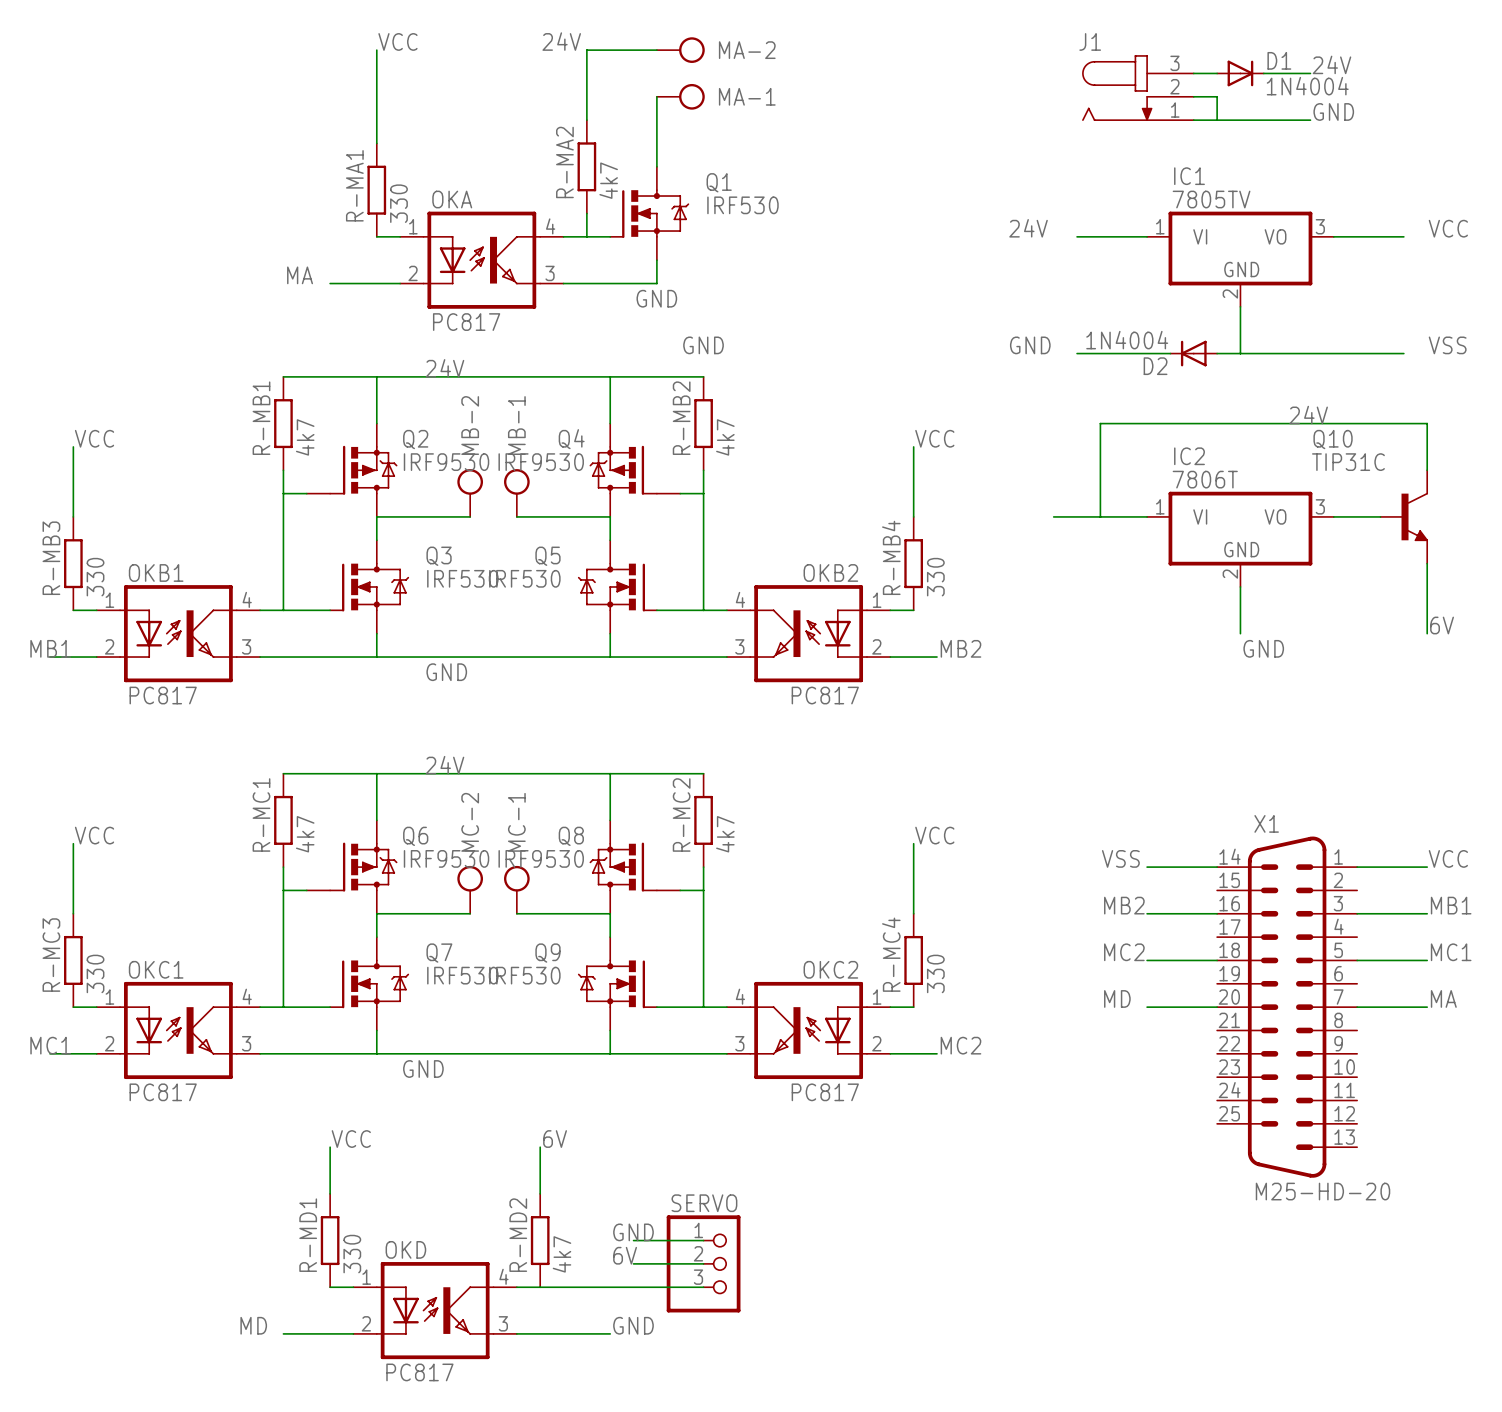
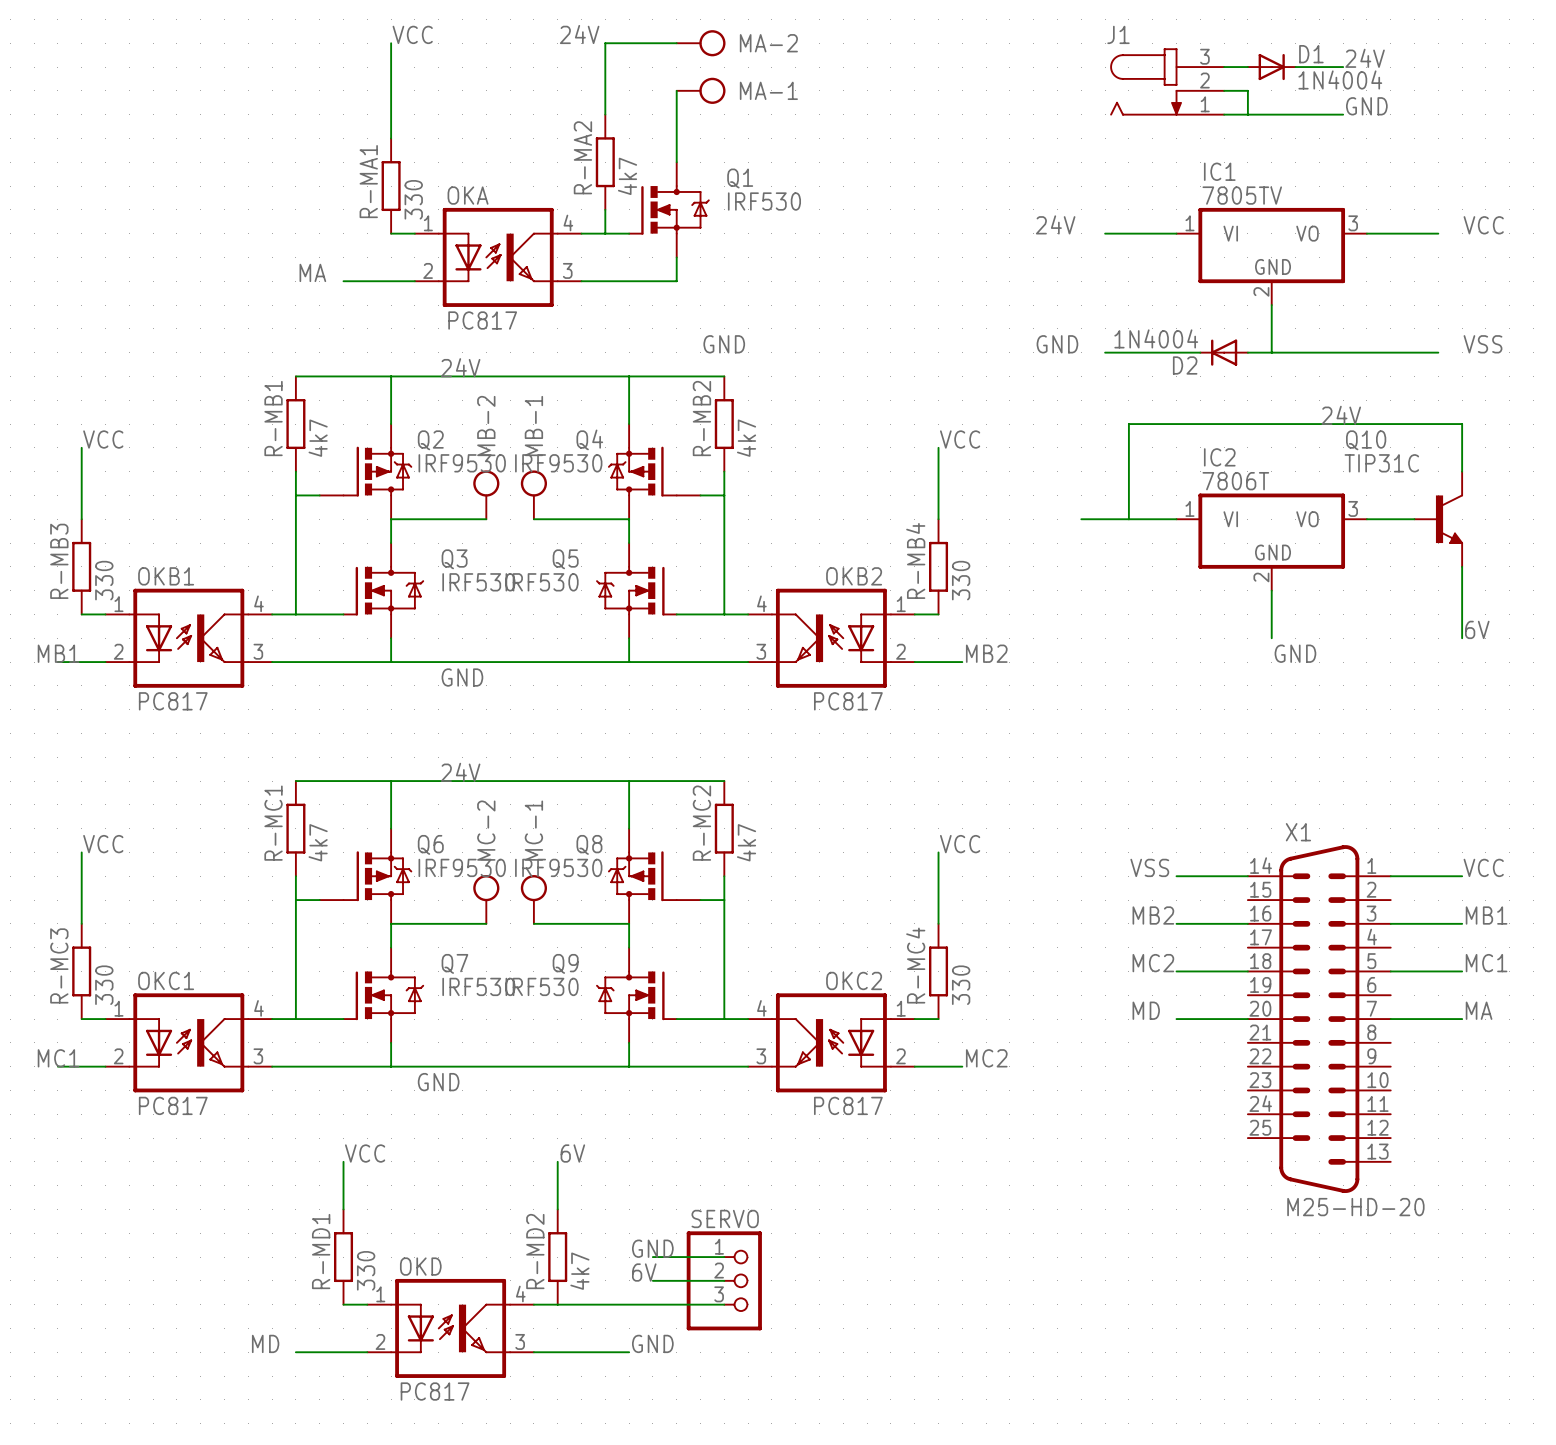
label: GND (656, 298) -> none

